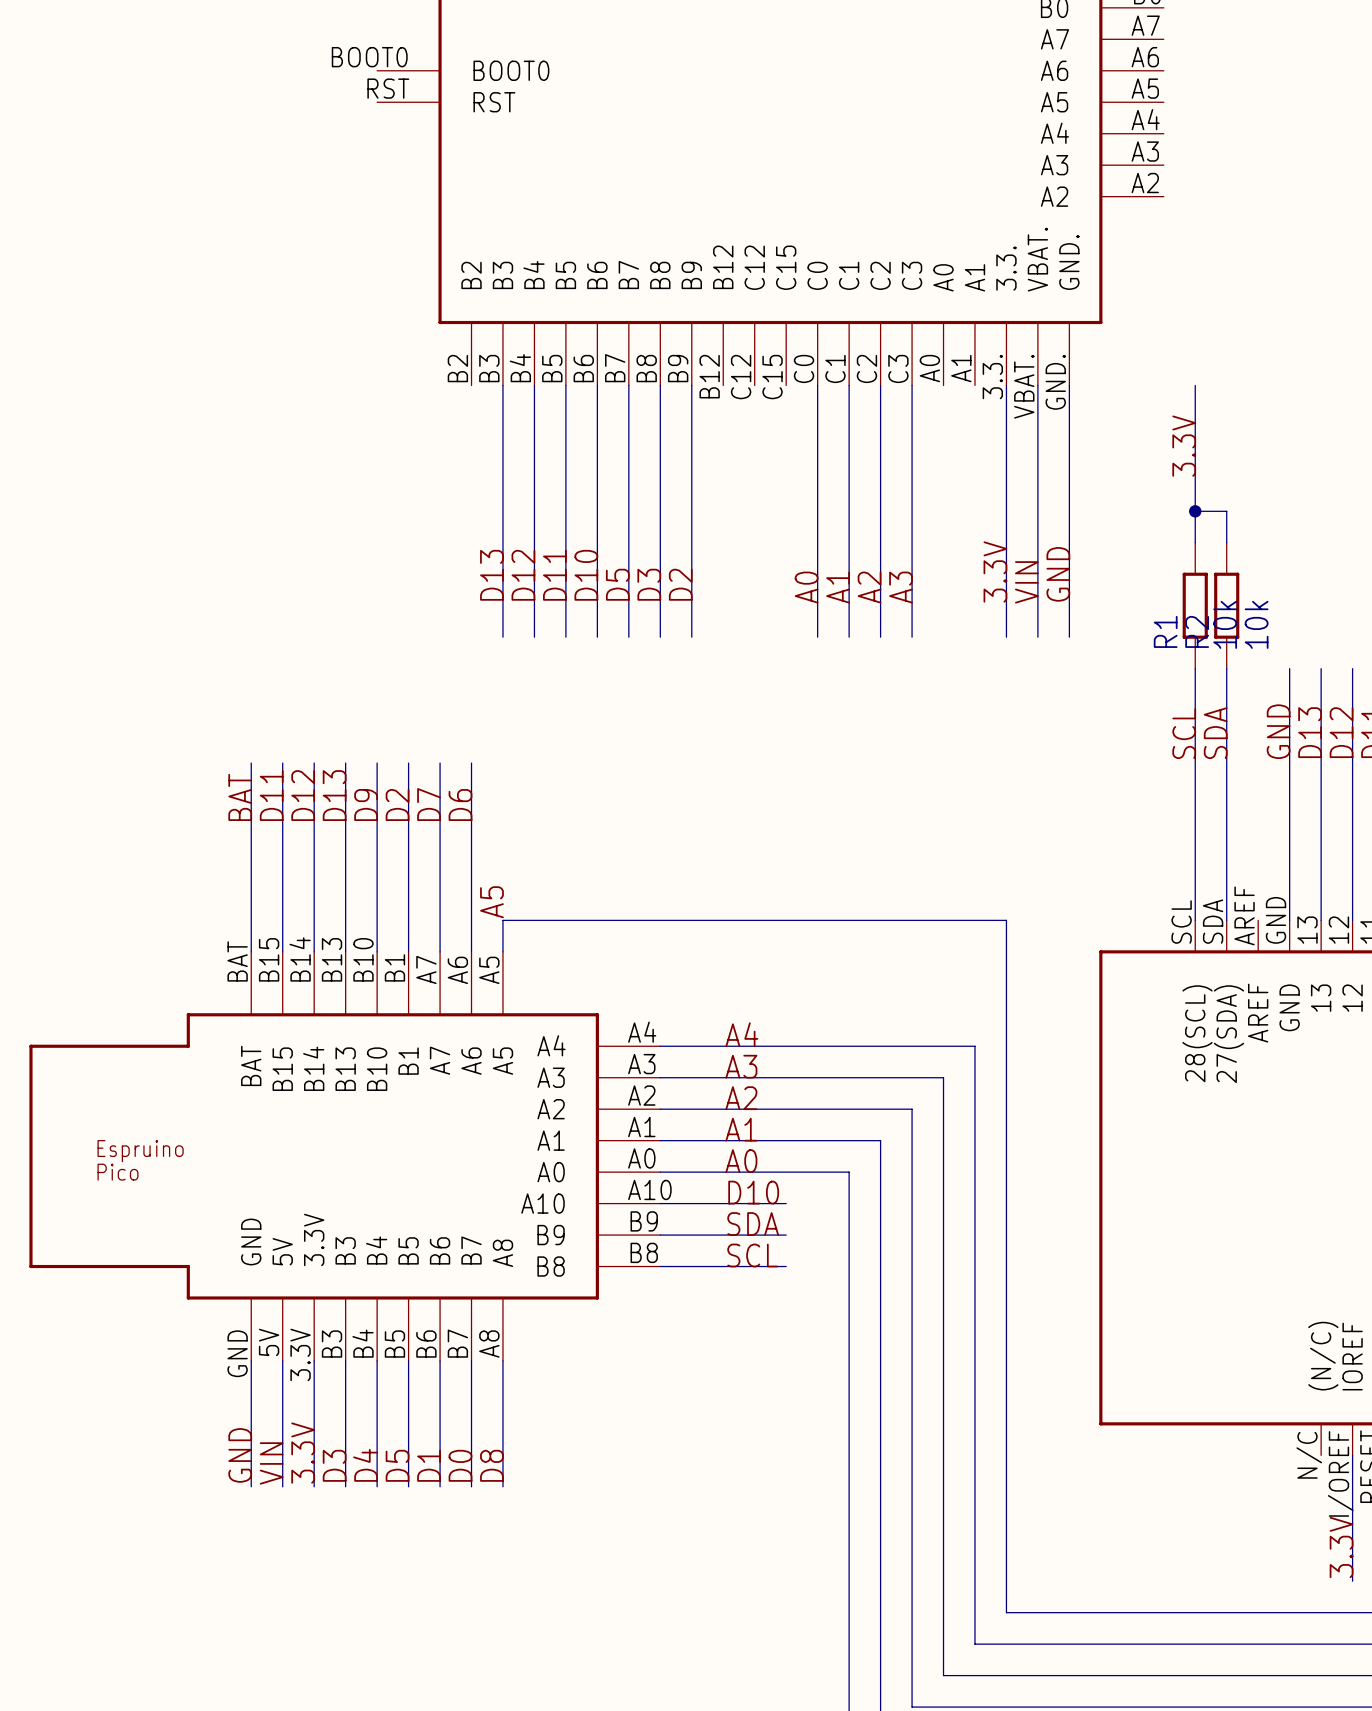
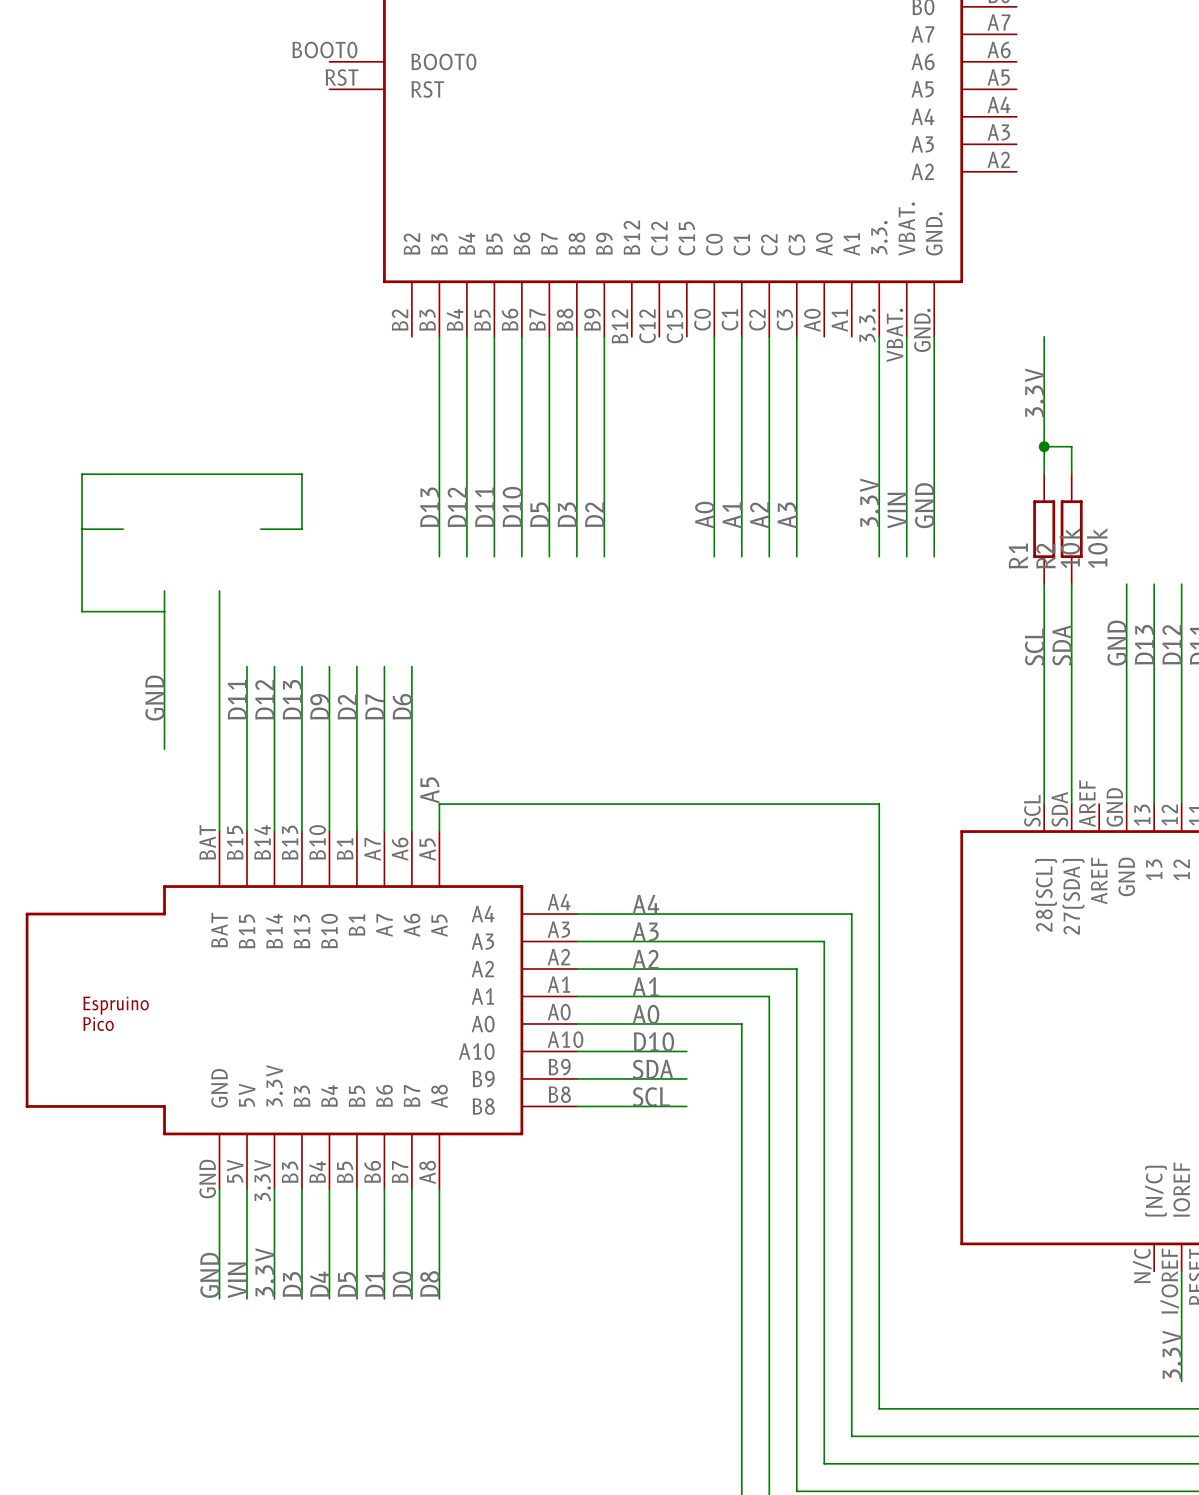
wire: none -> (82, 529) (123, 529)
wire: none -> (260, 529) (301, 529) (301, 474) (82, 474) (82, 611) (164, 611)
wire: none -> (164, 591) (164, 749)
wire: none -> (219, 591) (219, 666)
label: none -> GND (155, 698)
label: BAT (240, 797) -> none

